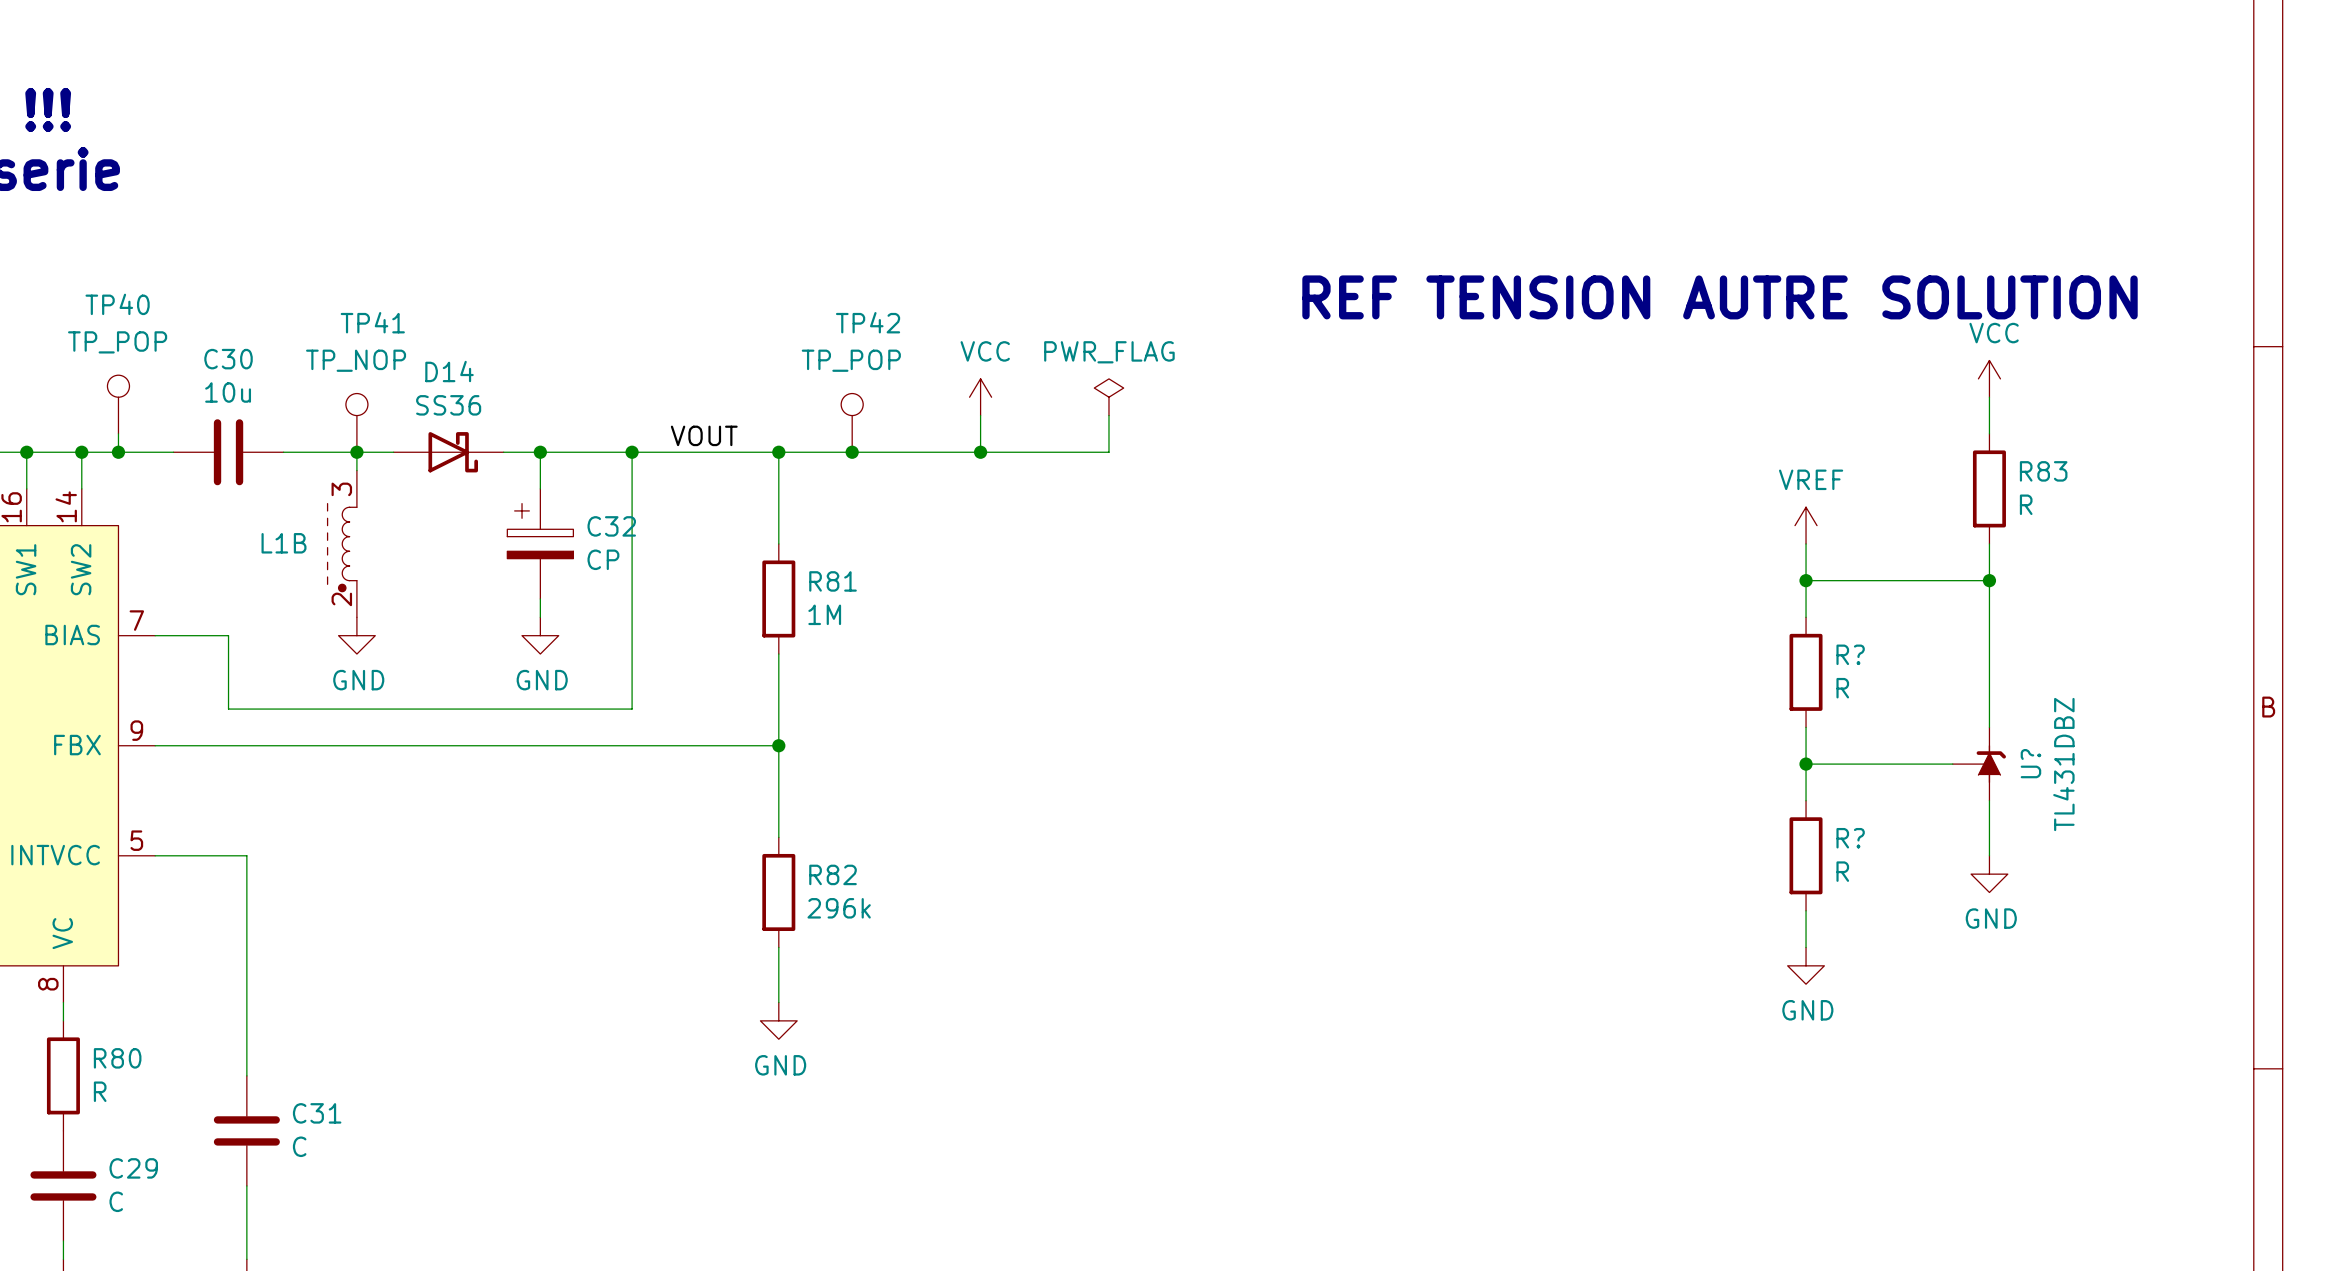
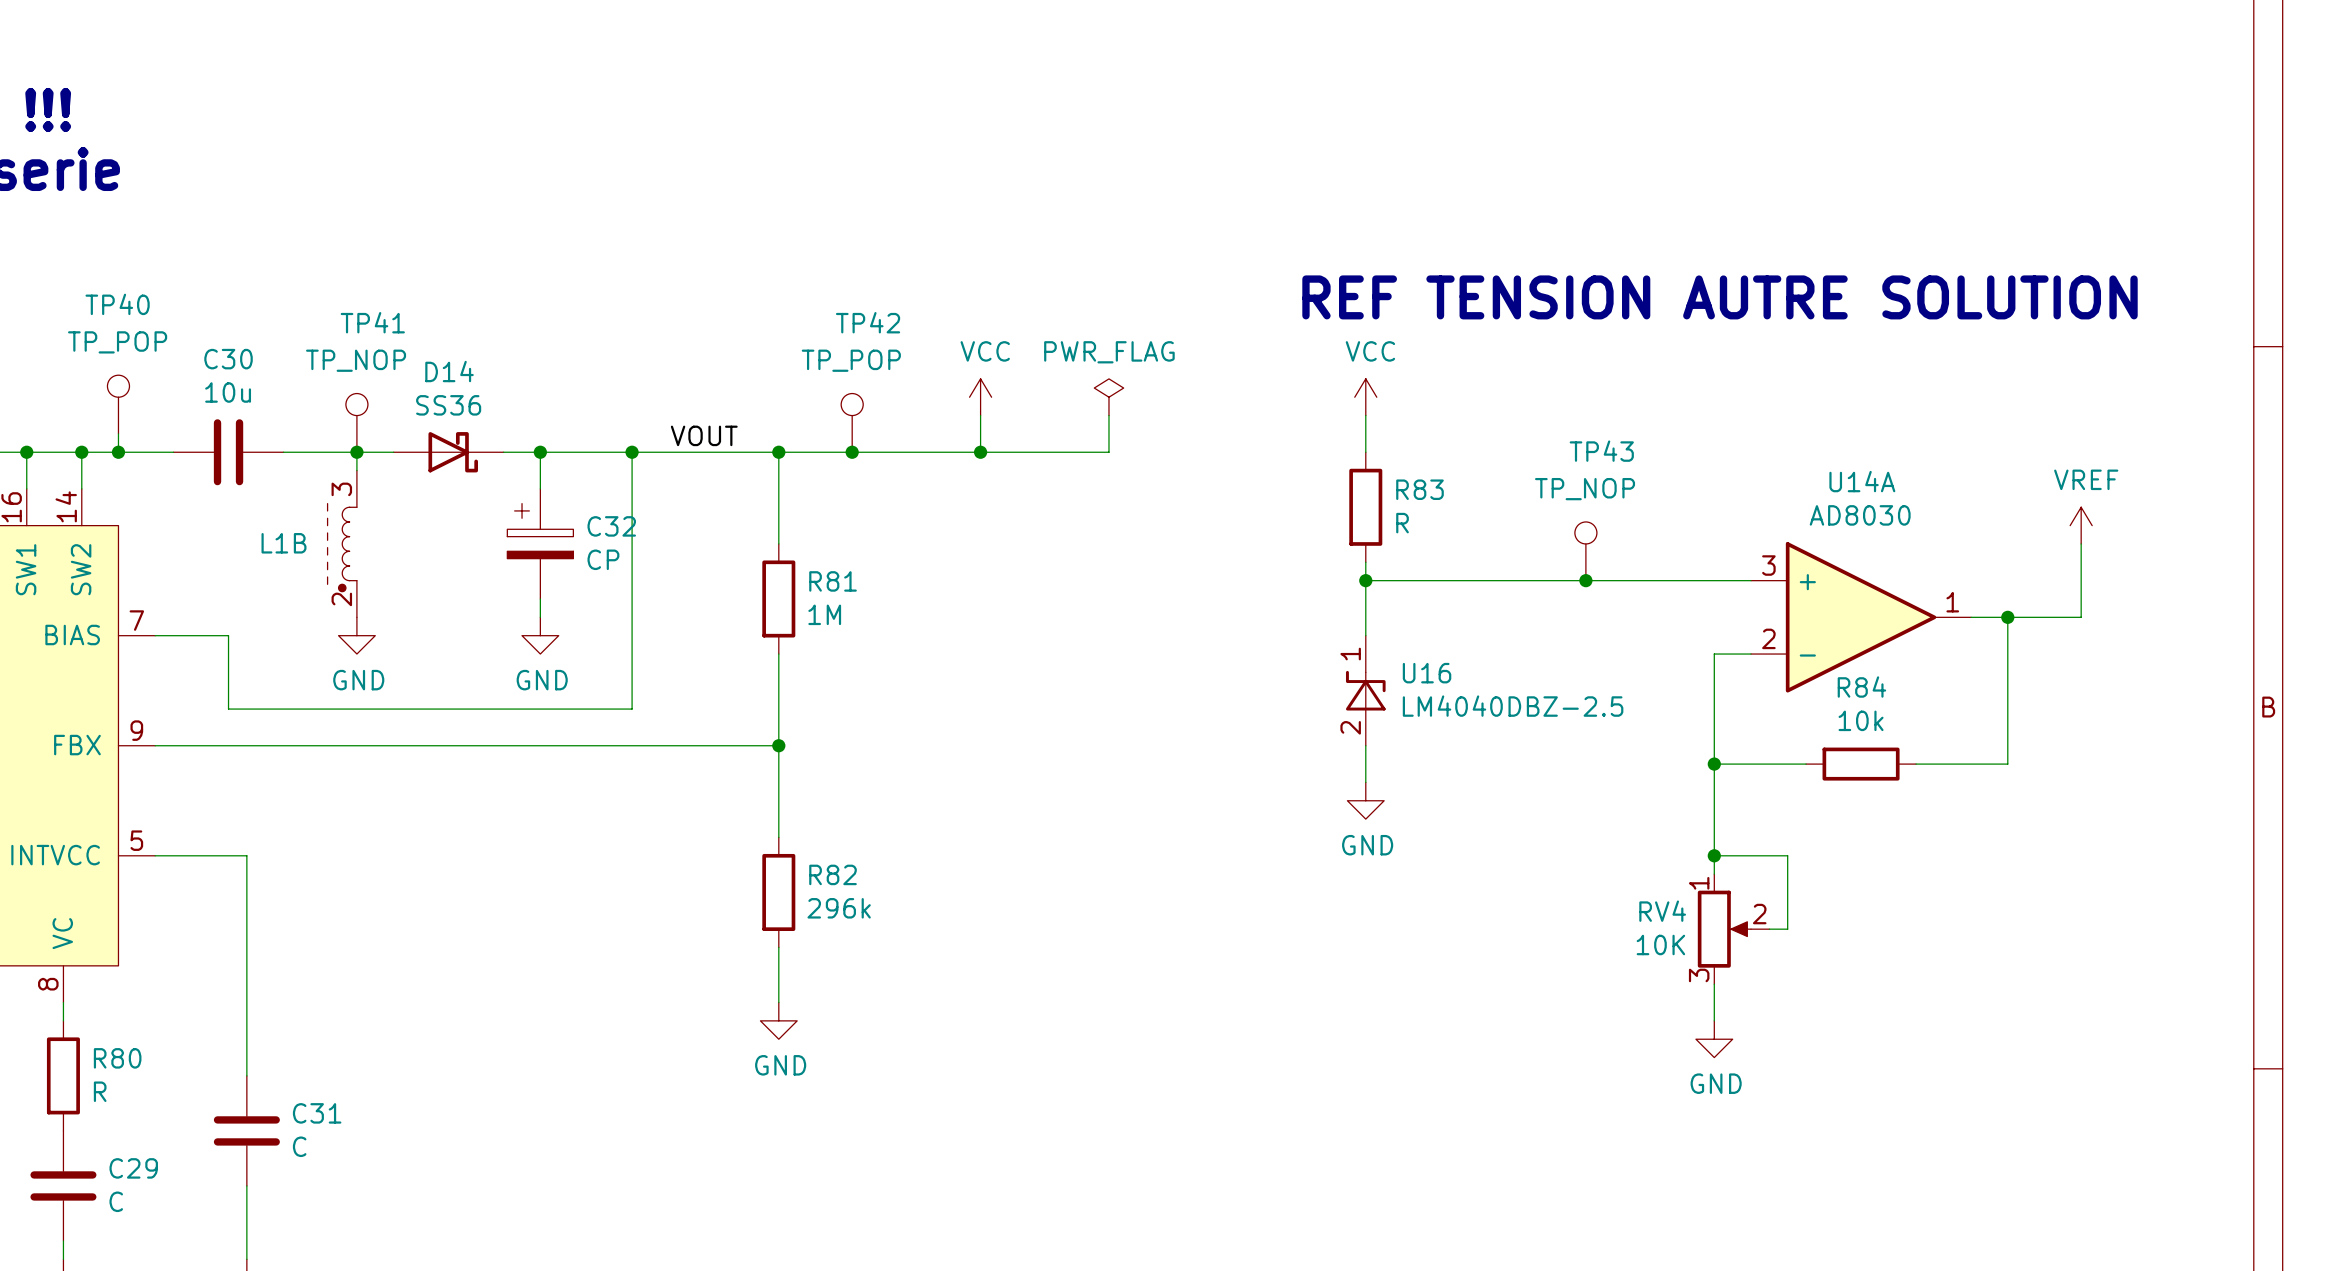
power symbol: VCC (1989, 378) -> none
power symbol: none -> VCC (1365, 397)
wire: (1989, 397) (1989, 433) -> none
wire: none -> (1365, 415) (1365, 452)
R83 position: (1989, 488) -> (1365, 507)
power symbol position: VREF (1806, 525) -> VREF (2081, 525)
wire: (1989, 543) (1989, 727) -> none
wire: none -> (2081, 543) (2081, 617) (1971, 617)
TP43: none -> TP_NOP (1585, 551)
wire: none -> (1365, 562) (1365, 635)
wire: none -> (1365, 580) (1750, 580)
junction: none -> (1365, 580)
junction: none -> (1585, 580)
wire: (1806, 580) (1989, 580) -> none
junction: (1806, 580) -> none
junction position: (1989, 580) -> (2007, 617)
U14A: none -> AD8030 (1861, 617)
wire: none -> (2007, 617) (2007, 764) (1952, 764)
wire: none -> (1750, 654) (1714, 654) (1714, 874)
R?: R (1806, 672) -> none
U16: none -> LM4040DBZ-2.5 (1365, 690)
wire: (1806, 727) (1806, 800) -> none
wire: none -> (1365, 745) (1365, 782)
junction: none -> (1714, 764)
wire: (1806, 764) (1916, 764) -> (1806, 764) (1714, 764)
junction: (1806, 764) -> none
R84: none -> 10k (1861, 764)
U?: TL431DBZ (1979, 764) -> none
power symbol: none -> GND (1365, 800)
wire: (1989, 800) (1989, 855) -> none
wire: none -> (1714, 855) (1787, 855) (1787, 929) (1769, 929)
junction: none -> (1714, 855)
R?: R (1806, 855) -> none
power symbol: GND (1989, 874) -> none
wire: (1806, 910) (1806, 947) -> (1714, 984) (1714, 1020)
RV4: none -> 10K (1733, 929)
power symbol position: GND (1806, 965) -> GND (1714, 1039)

